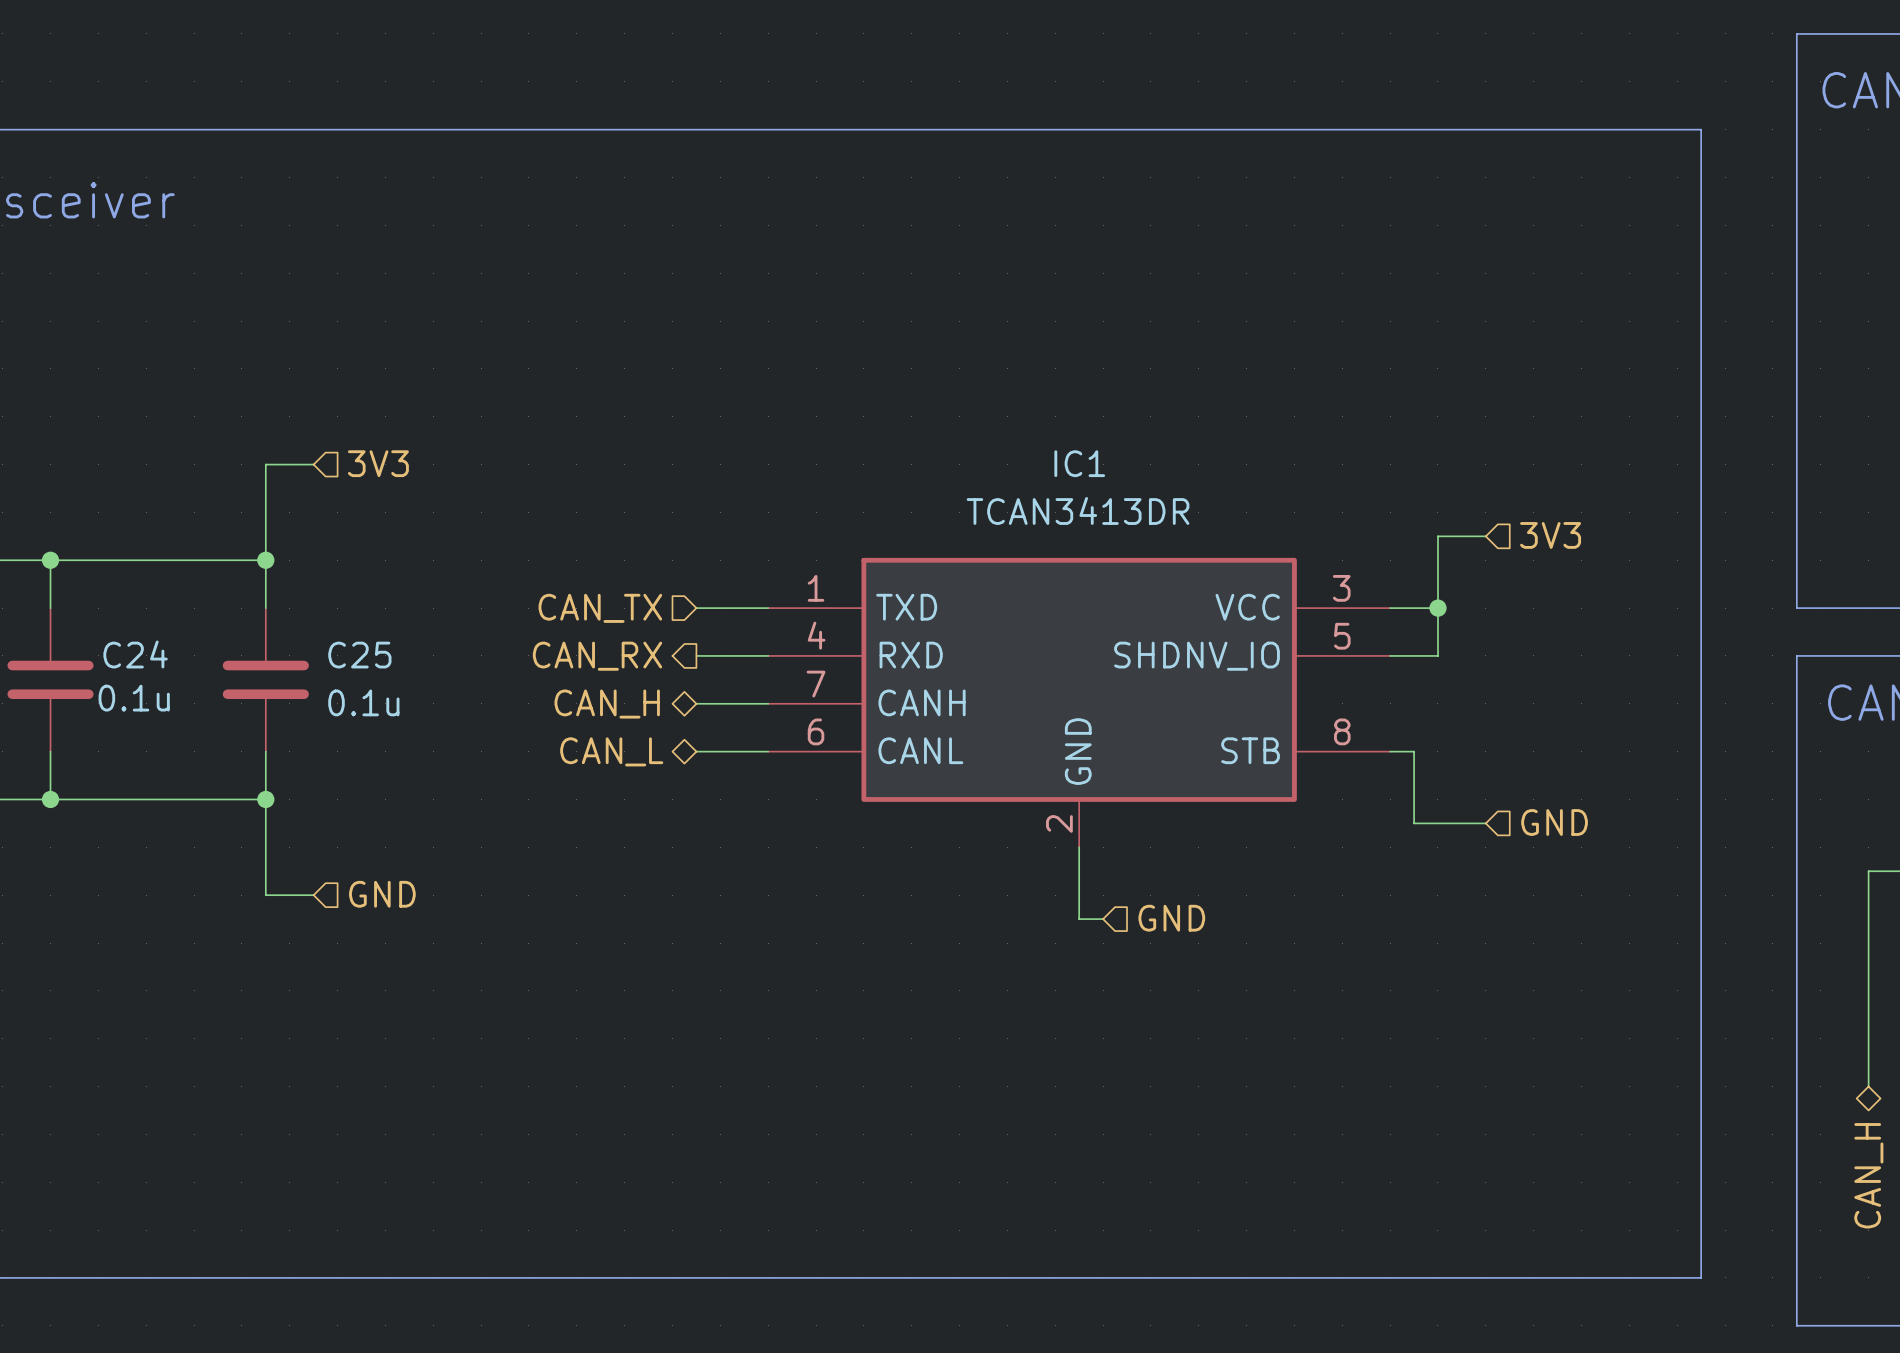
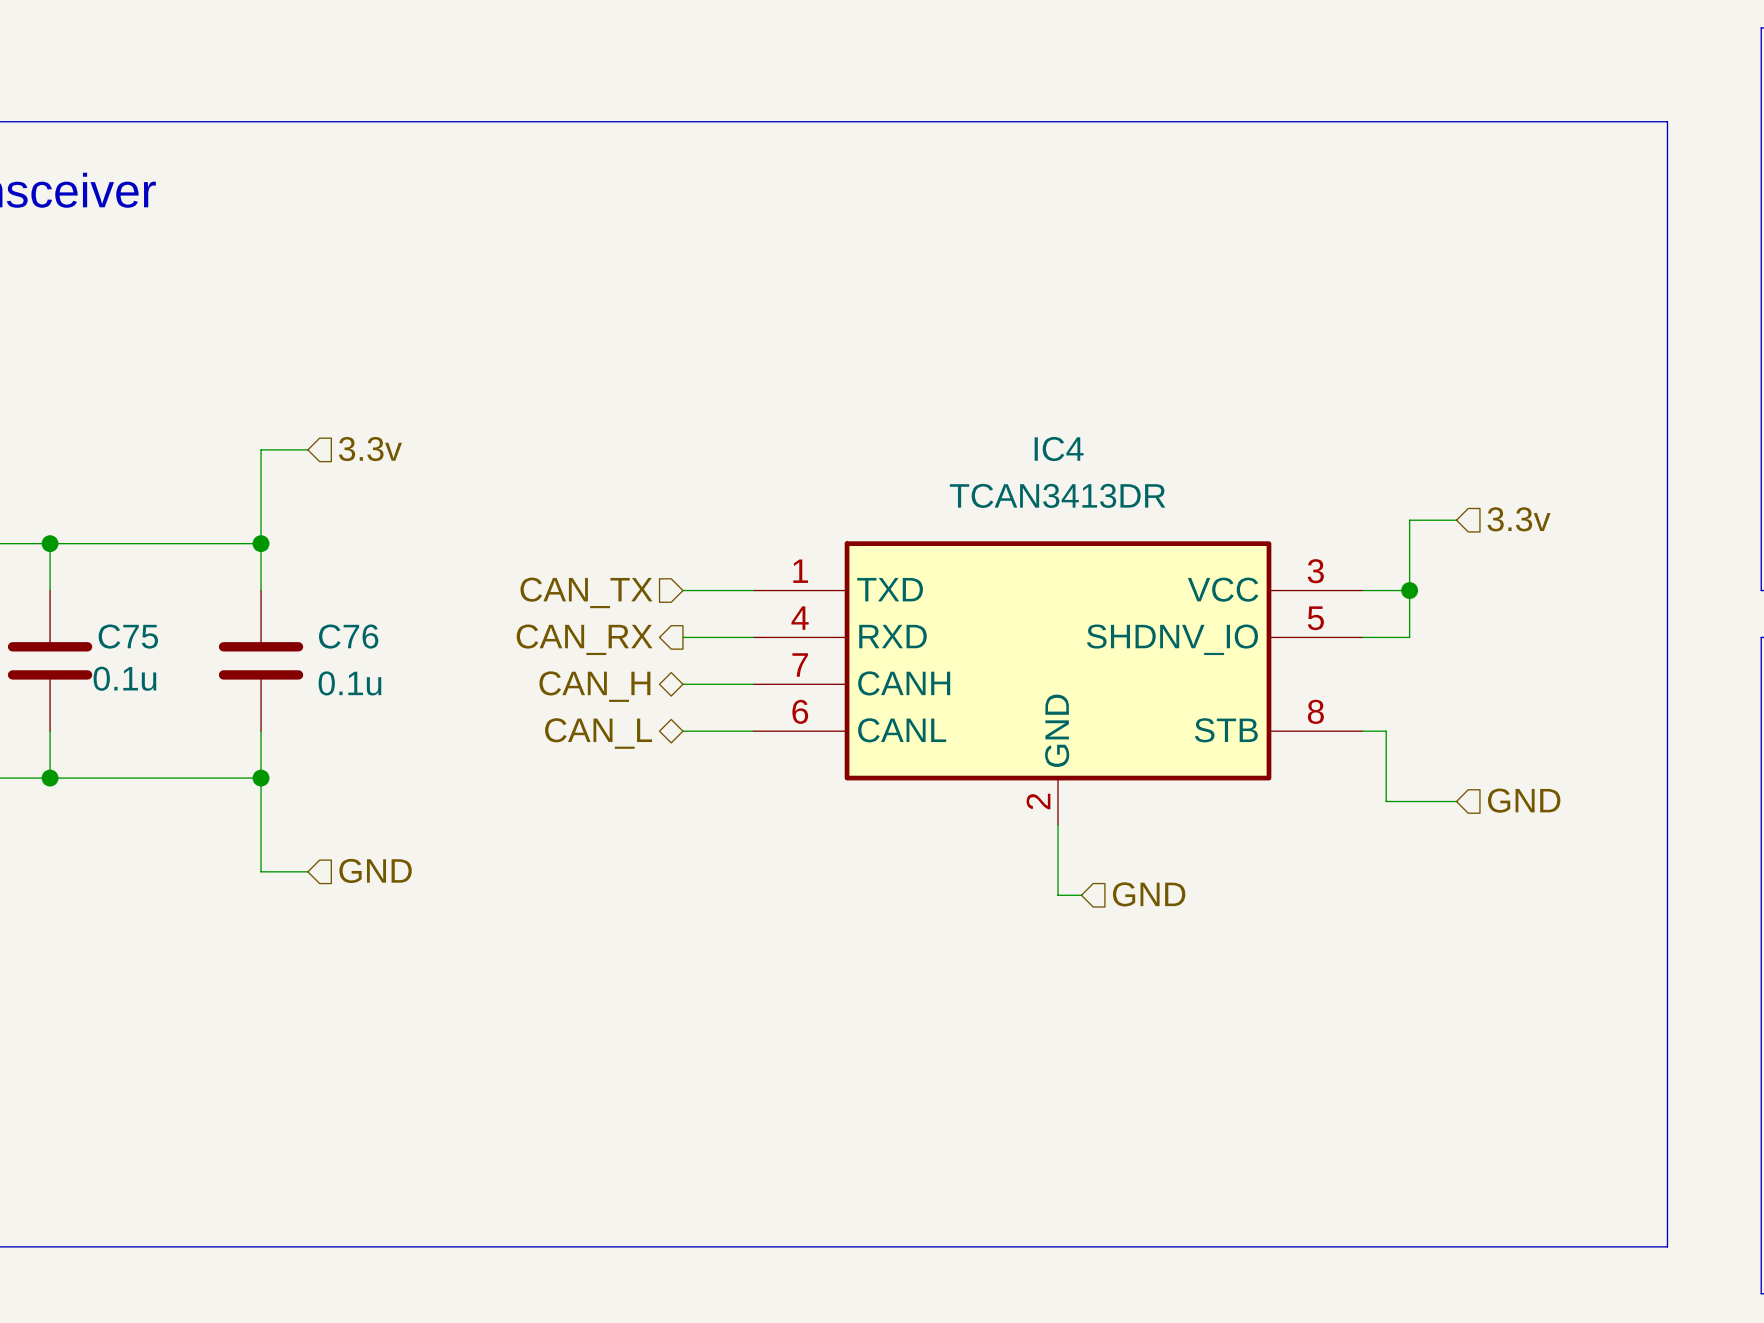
hierarchical label: 3V3 (378, 463) -> 3.3v (370, 449)
IC1 name: IC1 (1079, 463) -> IC4 (1059, 449)
hierarchical label: 3V3 (1550, 535) -> 3.3v (1519, 519)
C24 name: C24 (135, 654) -> C75 (128, 636)
C25 name: C25 (359, 655) -> C76 (348, 636)

